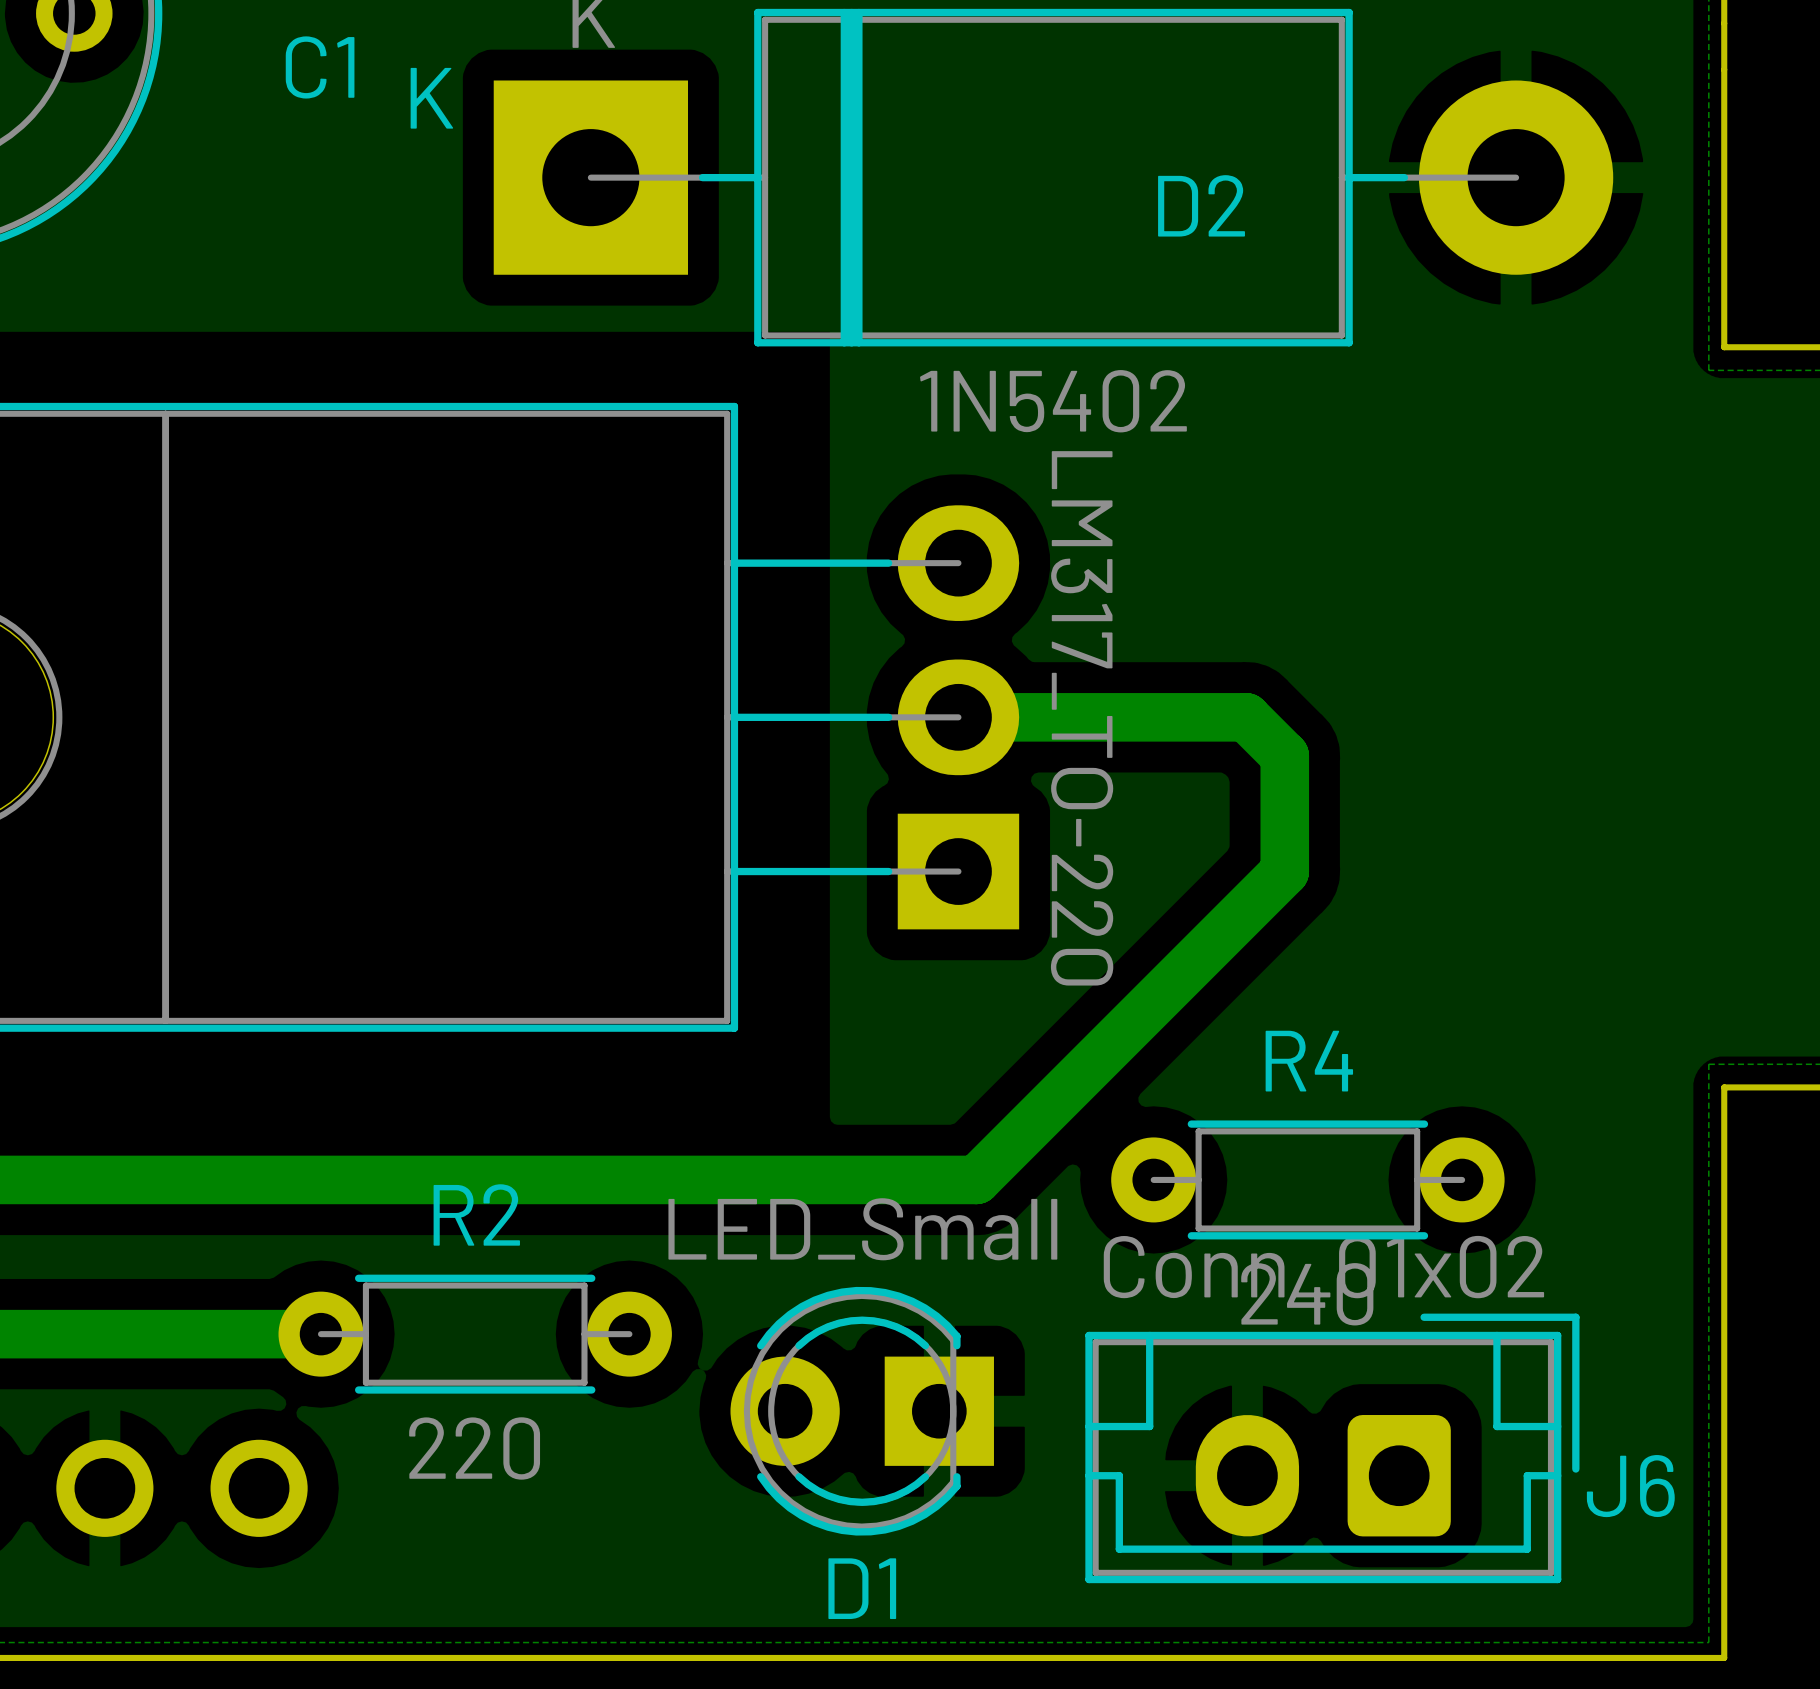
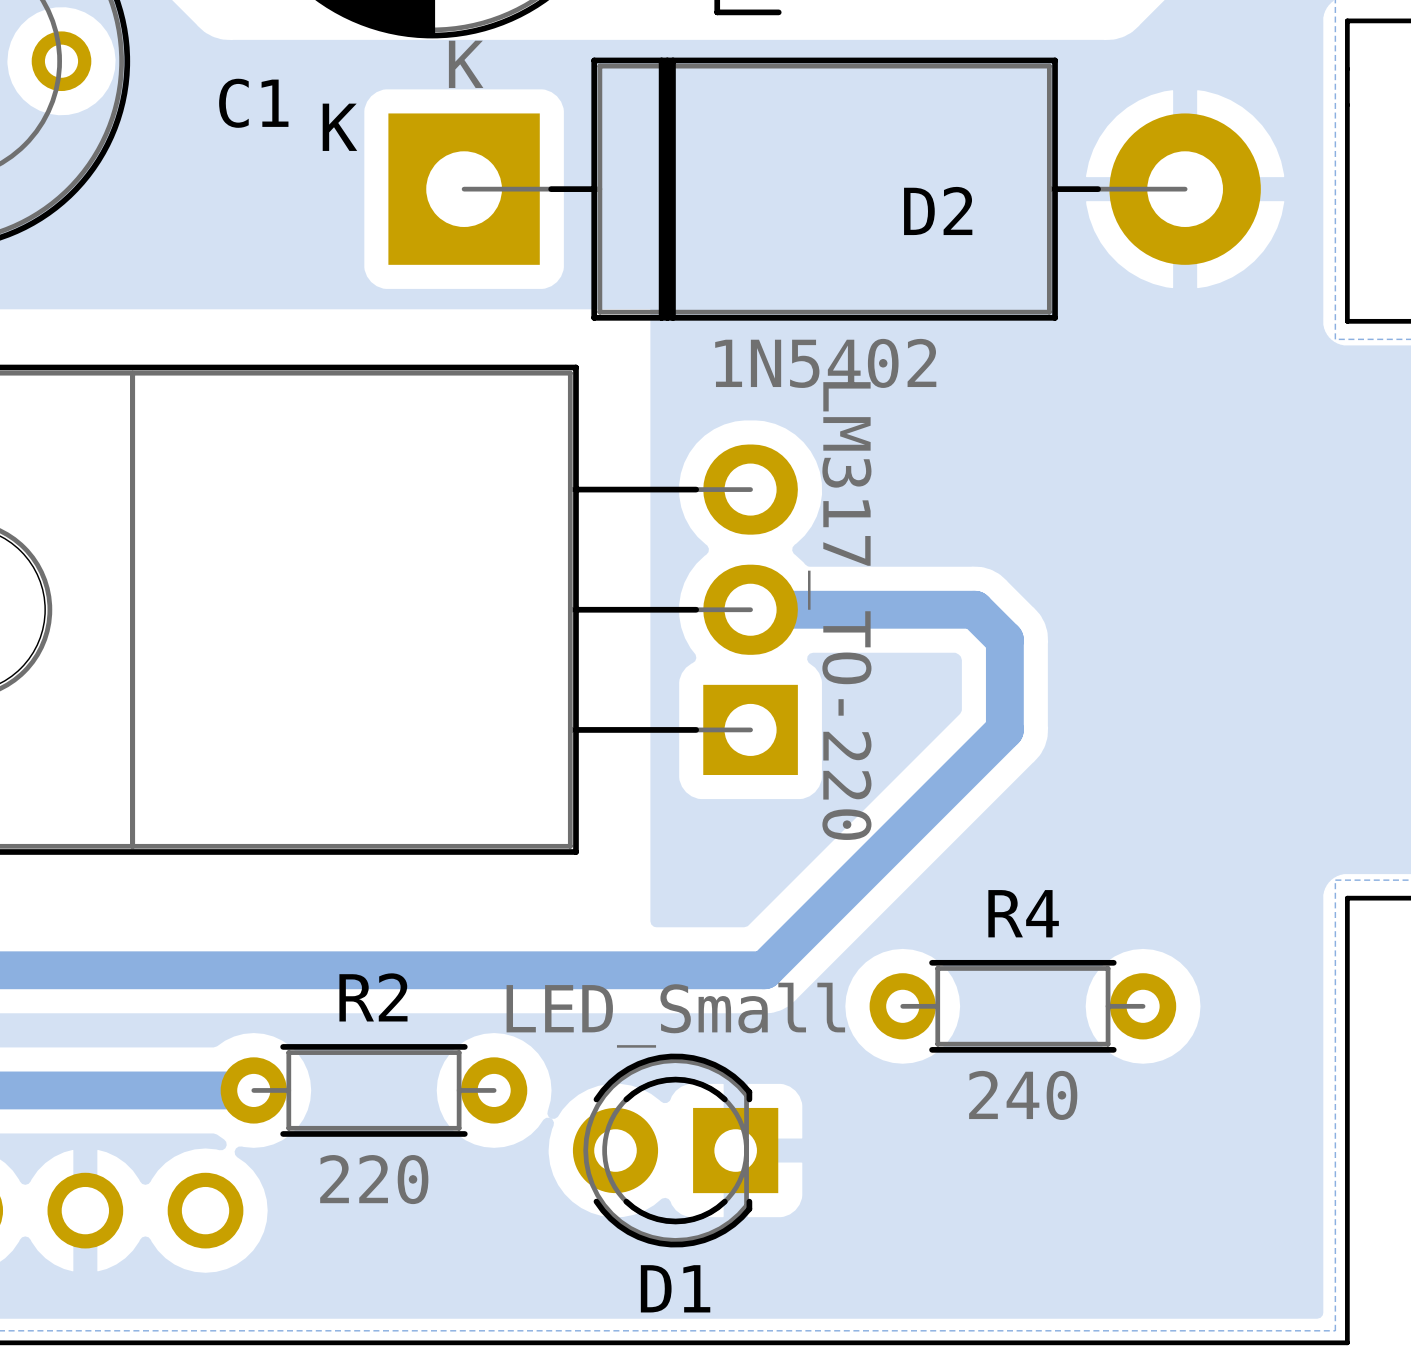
R4 position: (1307, 1179) -> (1022, 1006)
J6: Conn_01x02 (1332, 1448) -> none

